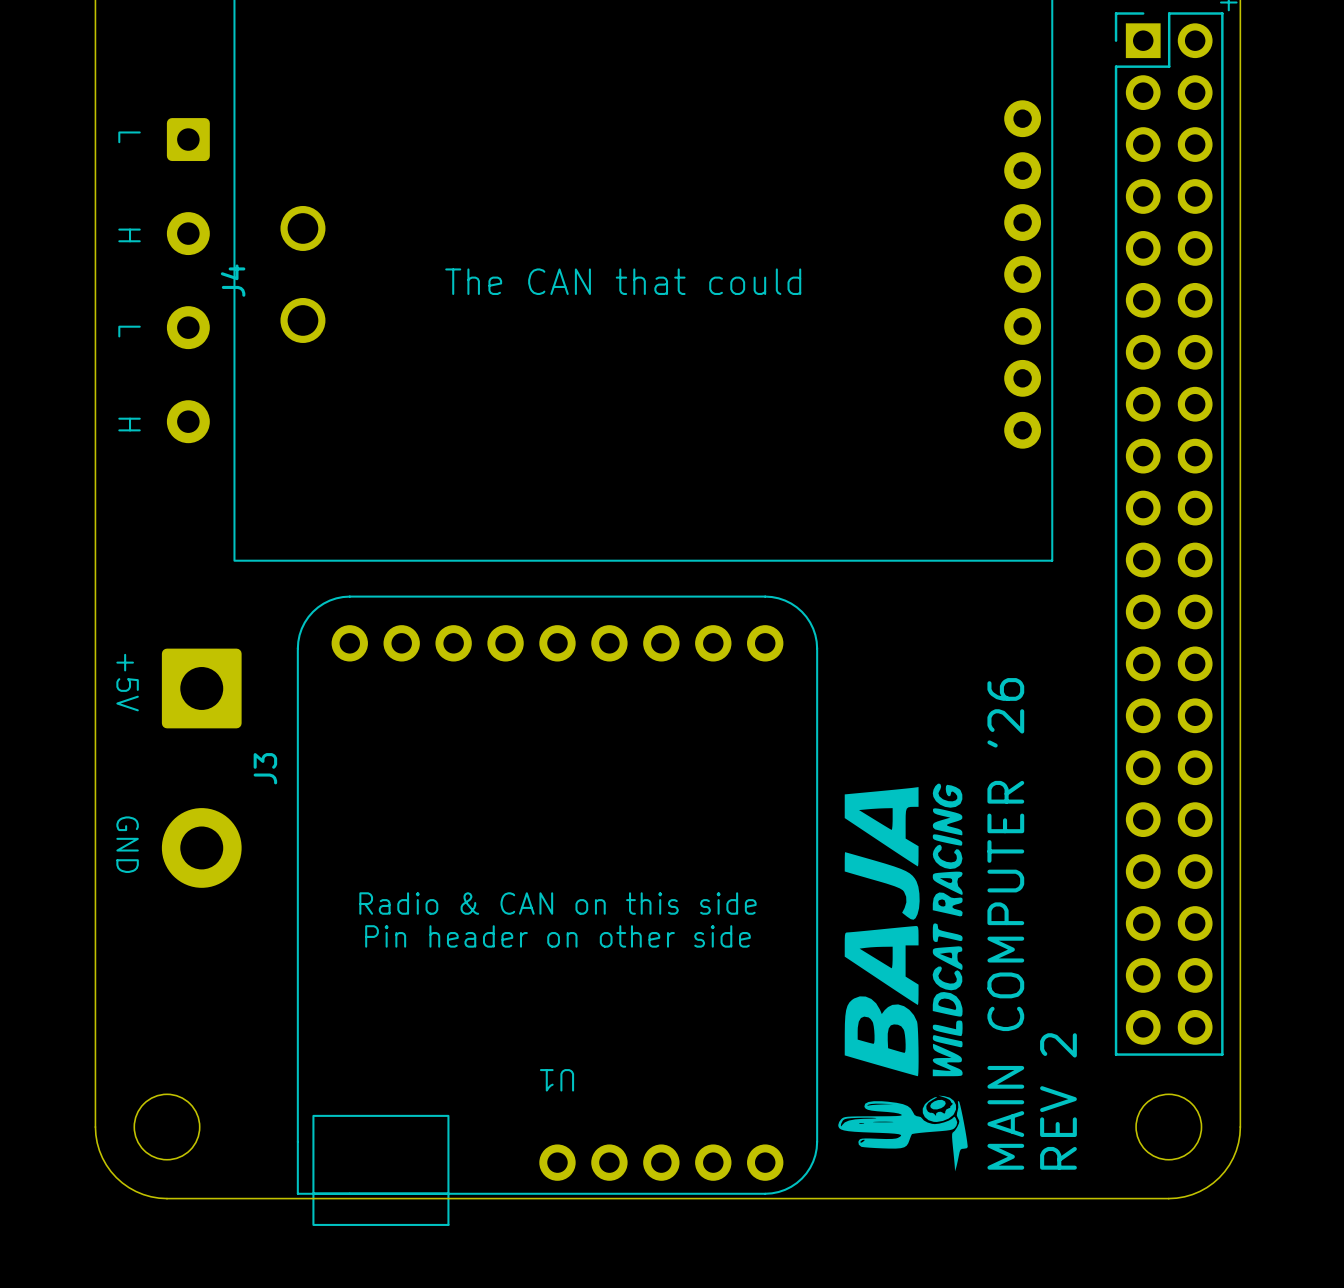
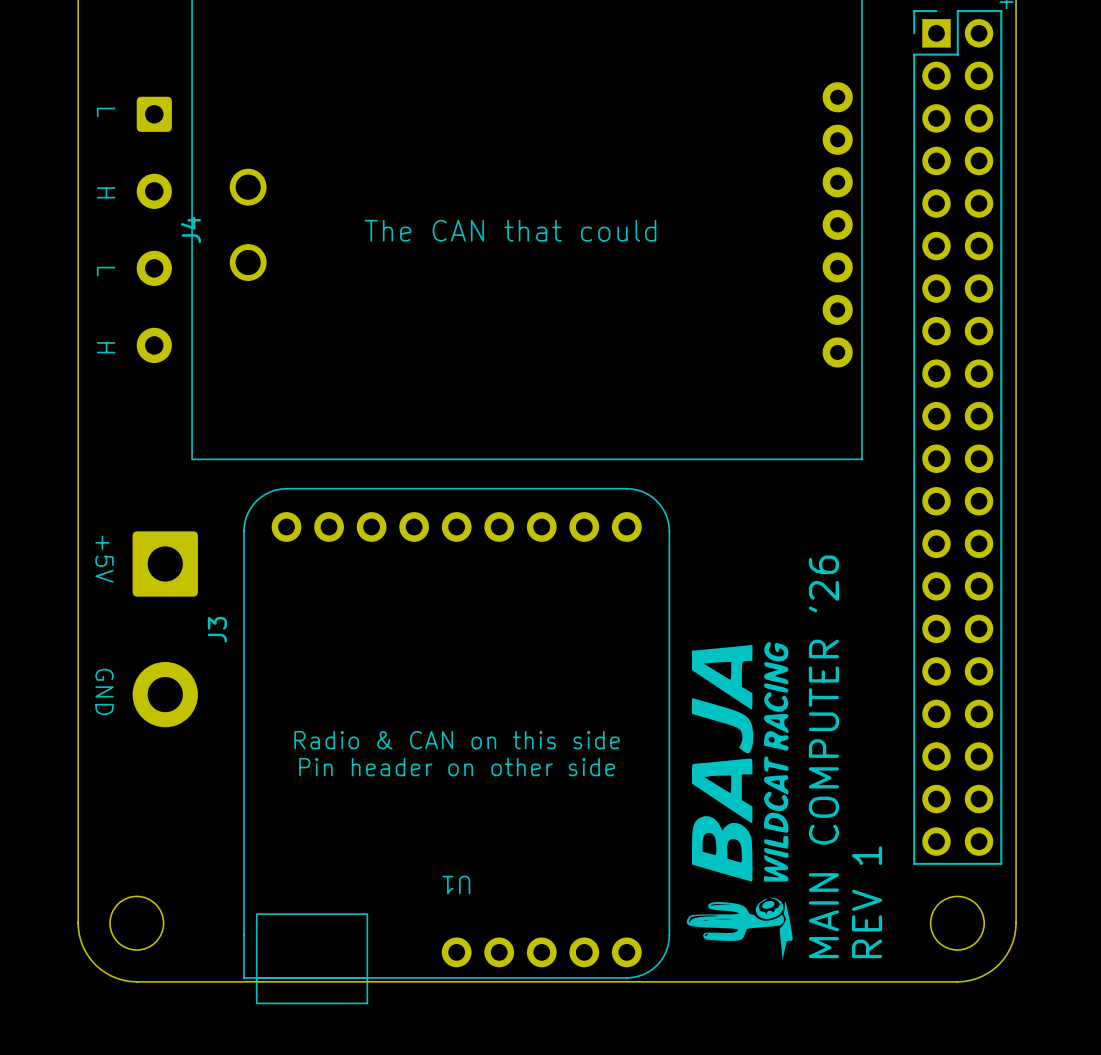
text: REV 2 (1058, 1101) -> REV 1 (867, 902)

